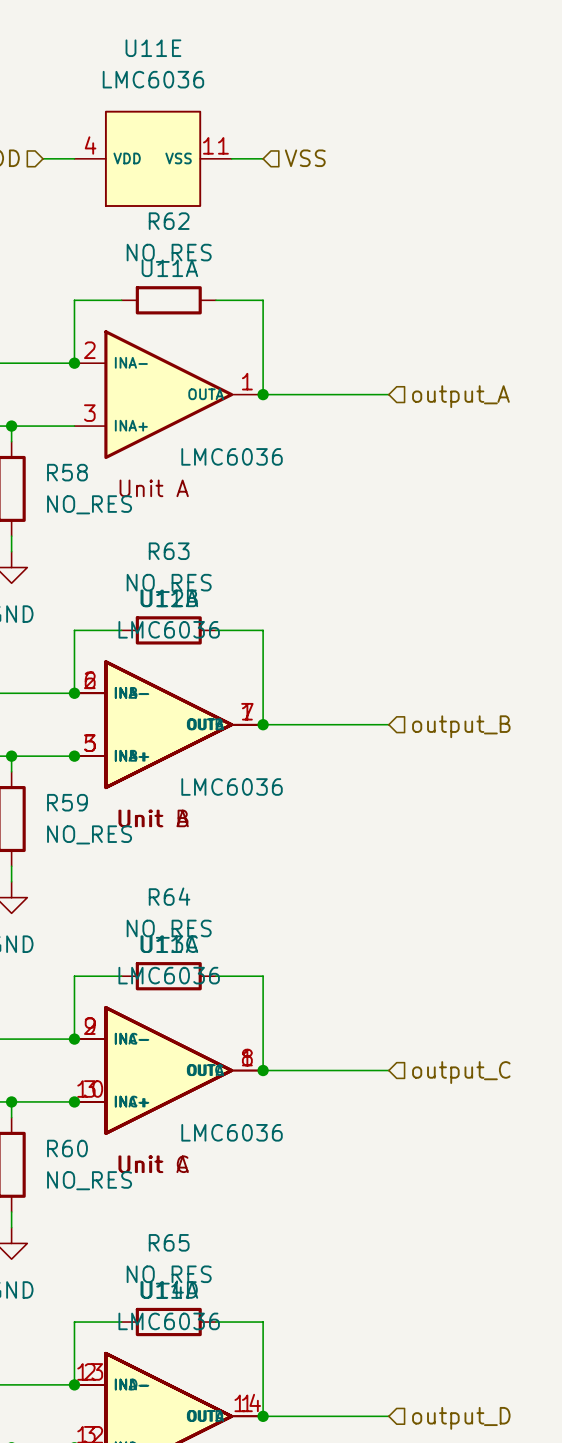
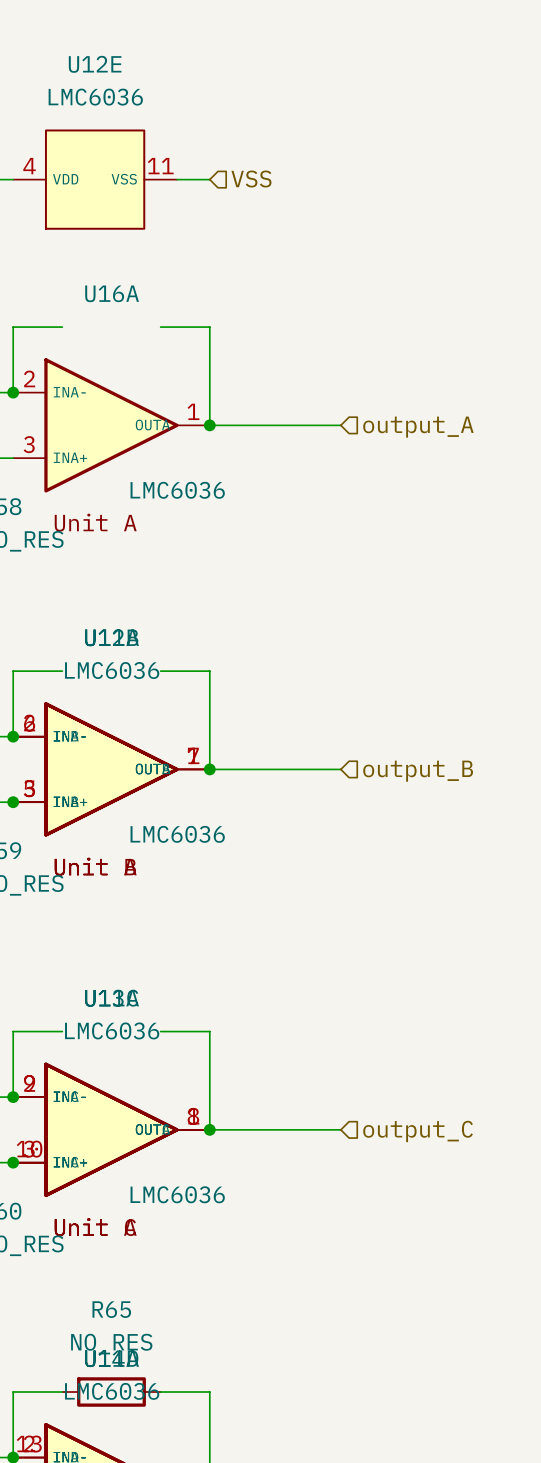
U11E name: U11E (153, 48) -> U12E (95, 64)
U11A name: U11A (169, 268) -> U16A (112, 293)
R62: NO_RES (168, 300) -> none
R63: NO_RES (168, 630) -> none
R64: NO_RES (168, 976) -> none

